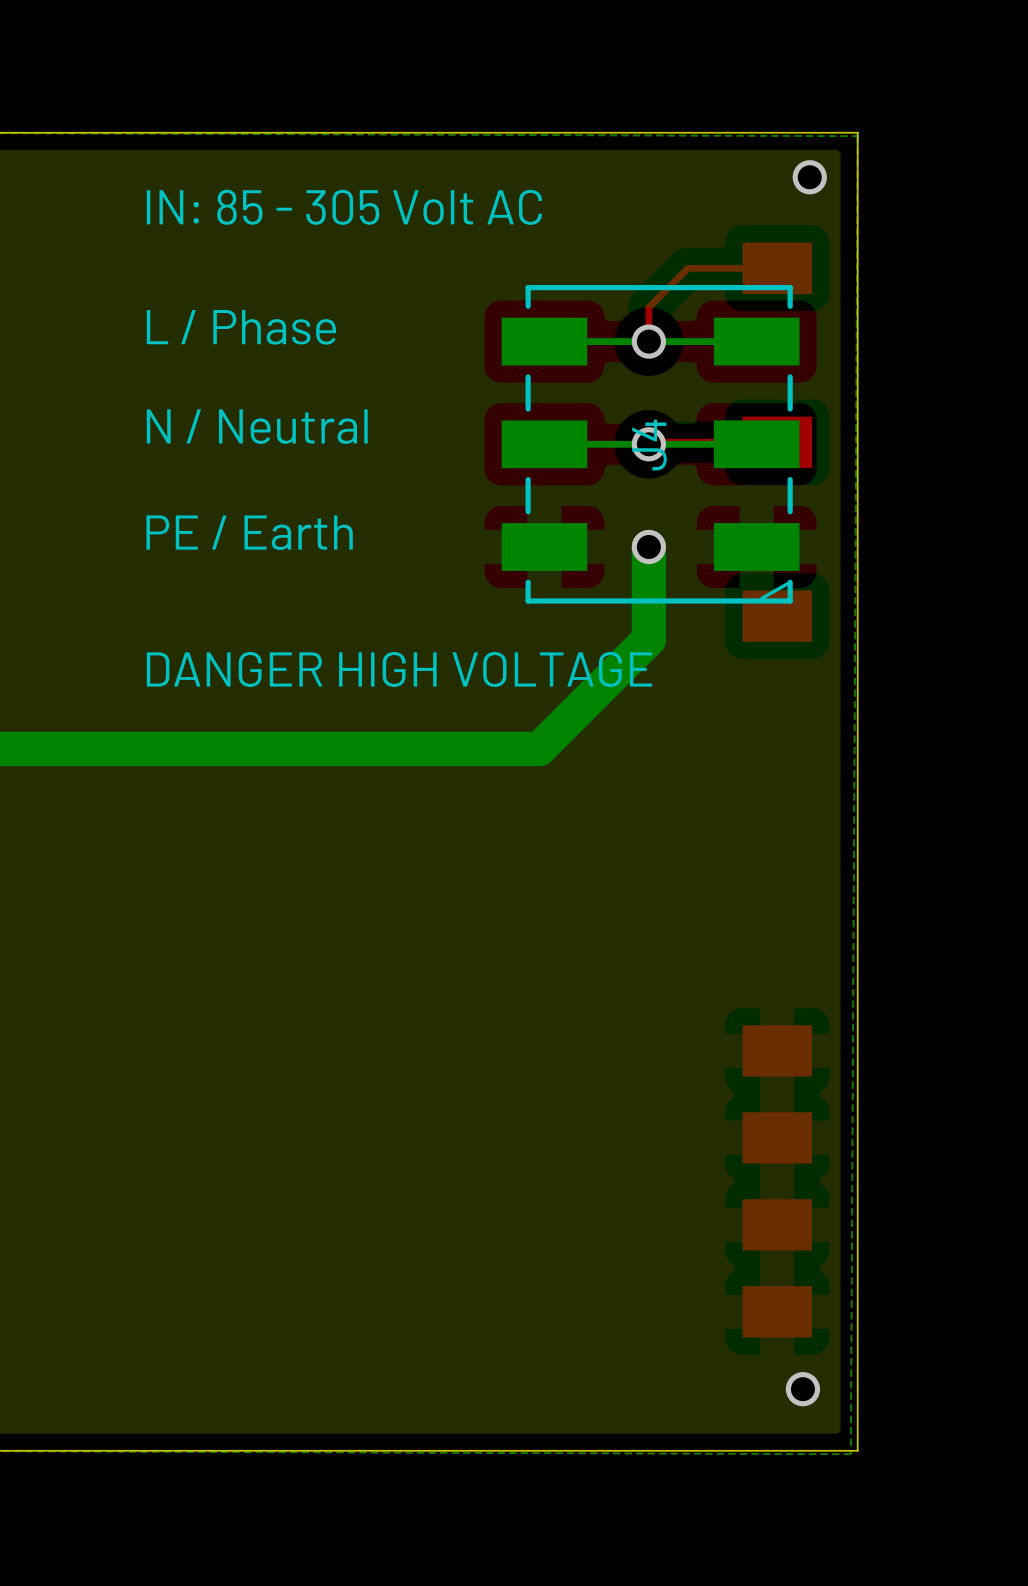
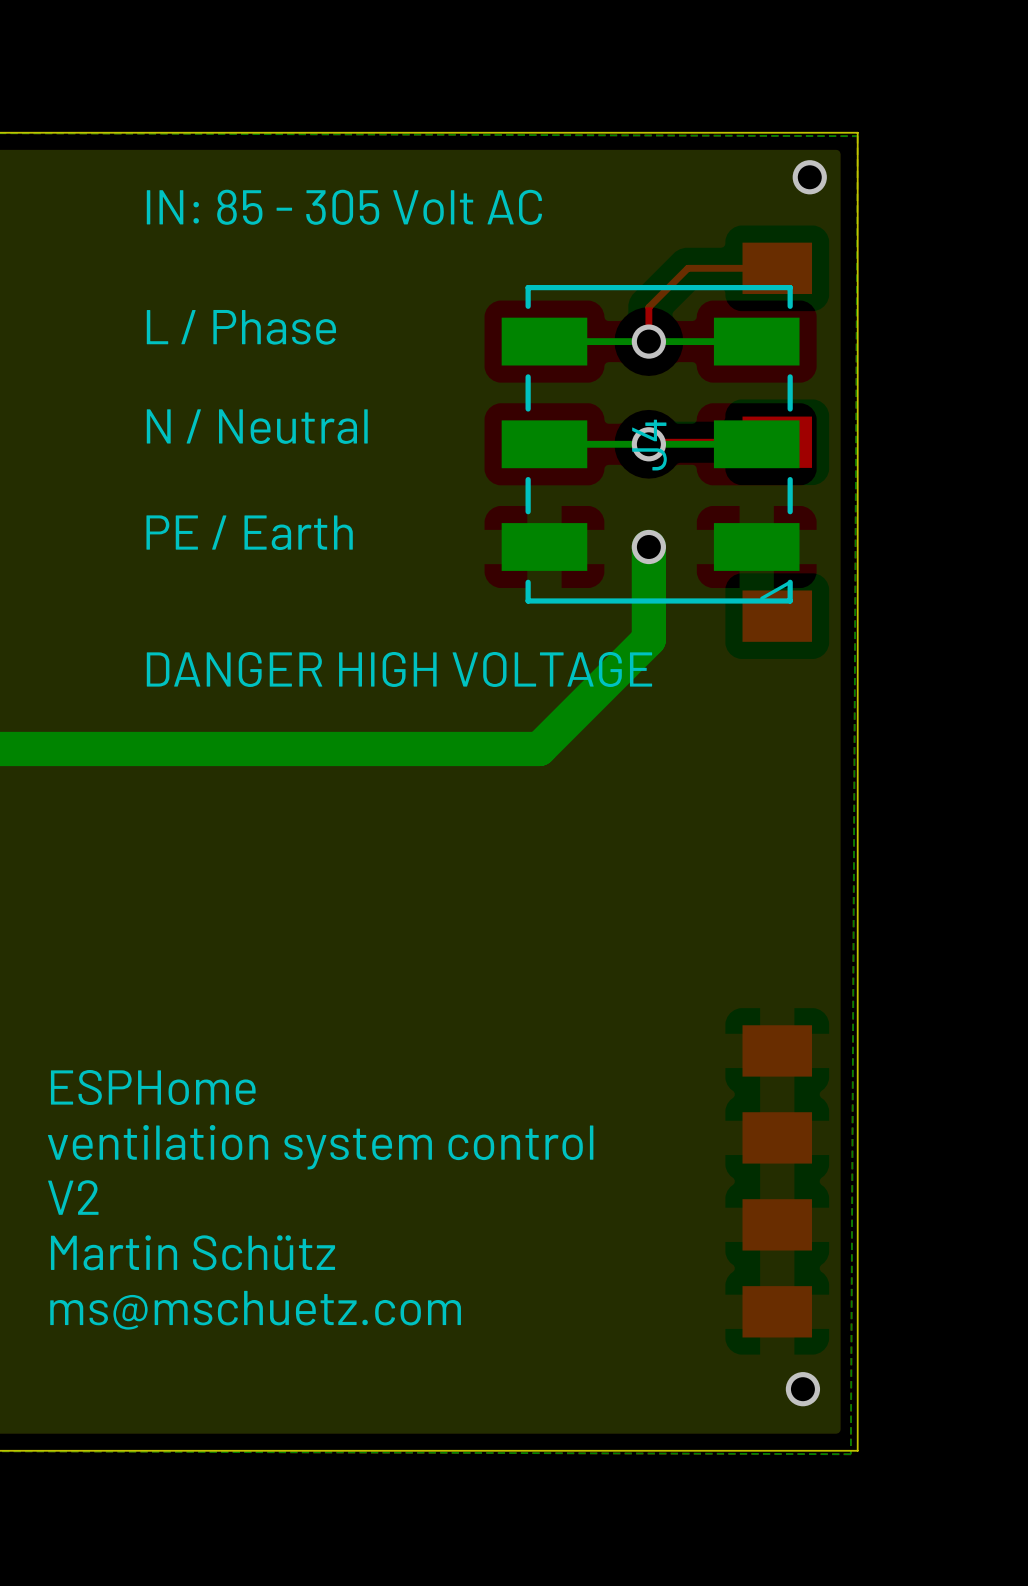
text: none -> ESPHome (153, 1087)
text: none -> ventilation system control (320, 1147)
text: none -> V2 (73, 1197)
text: none -> Martin Schütz (192, 1252)
text: none -> ms@mschuetz.com (255, 1310)

